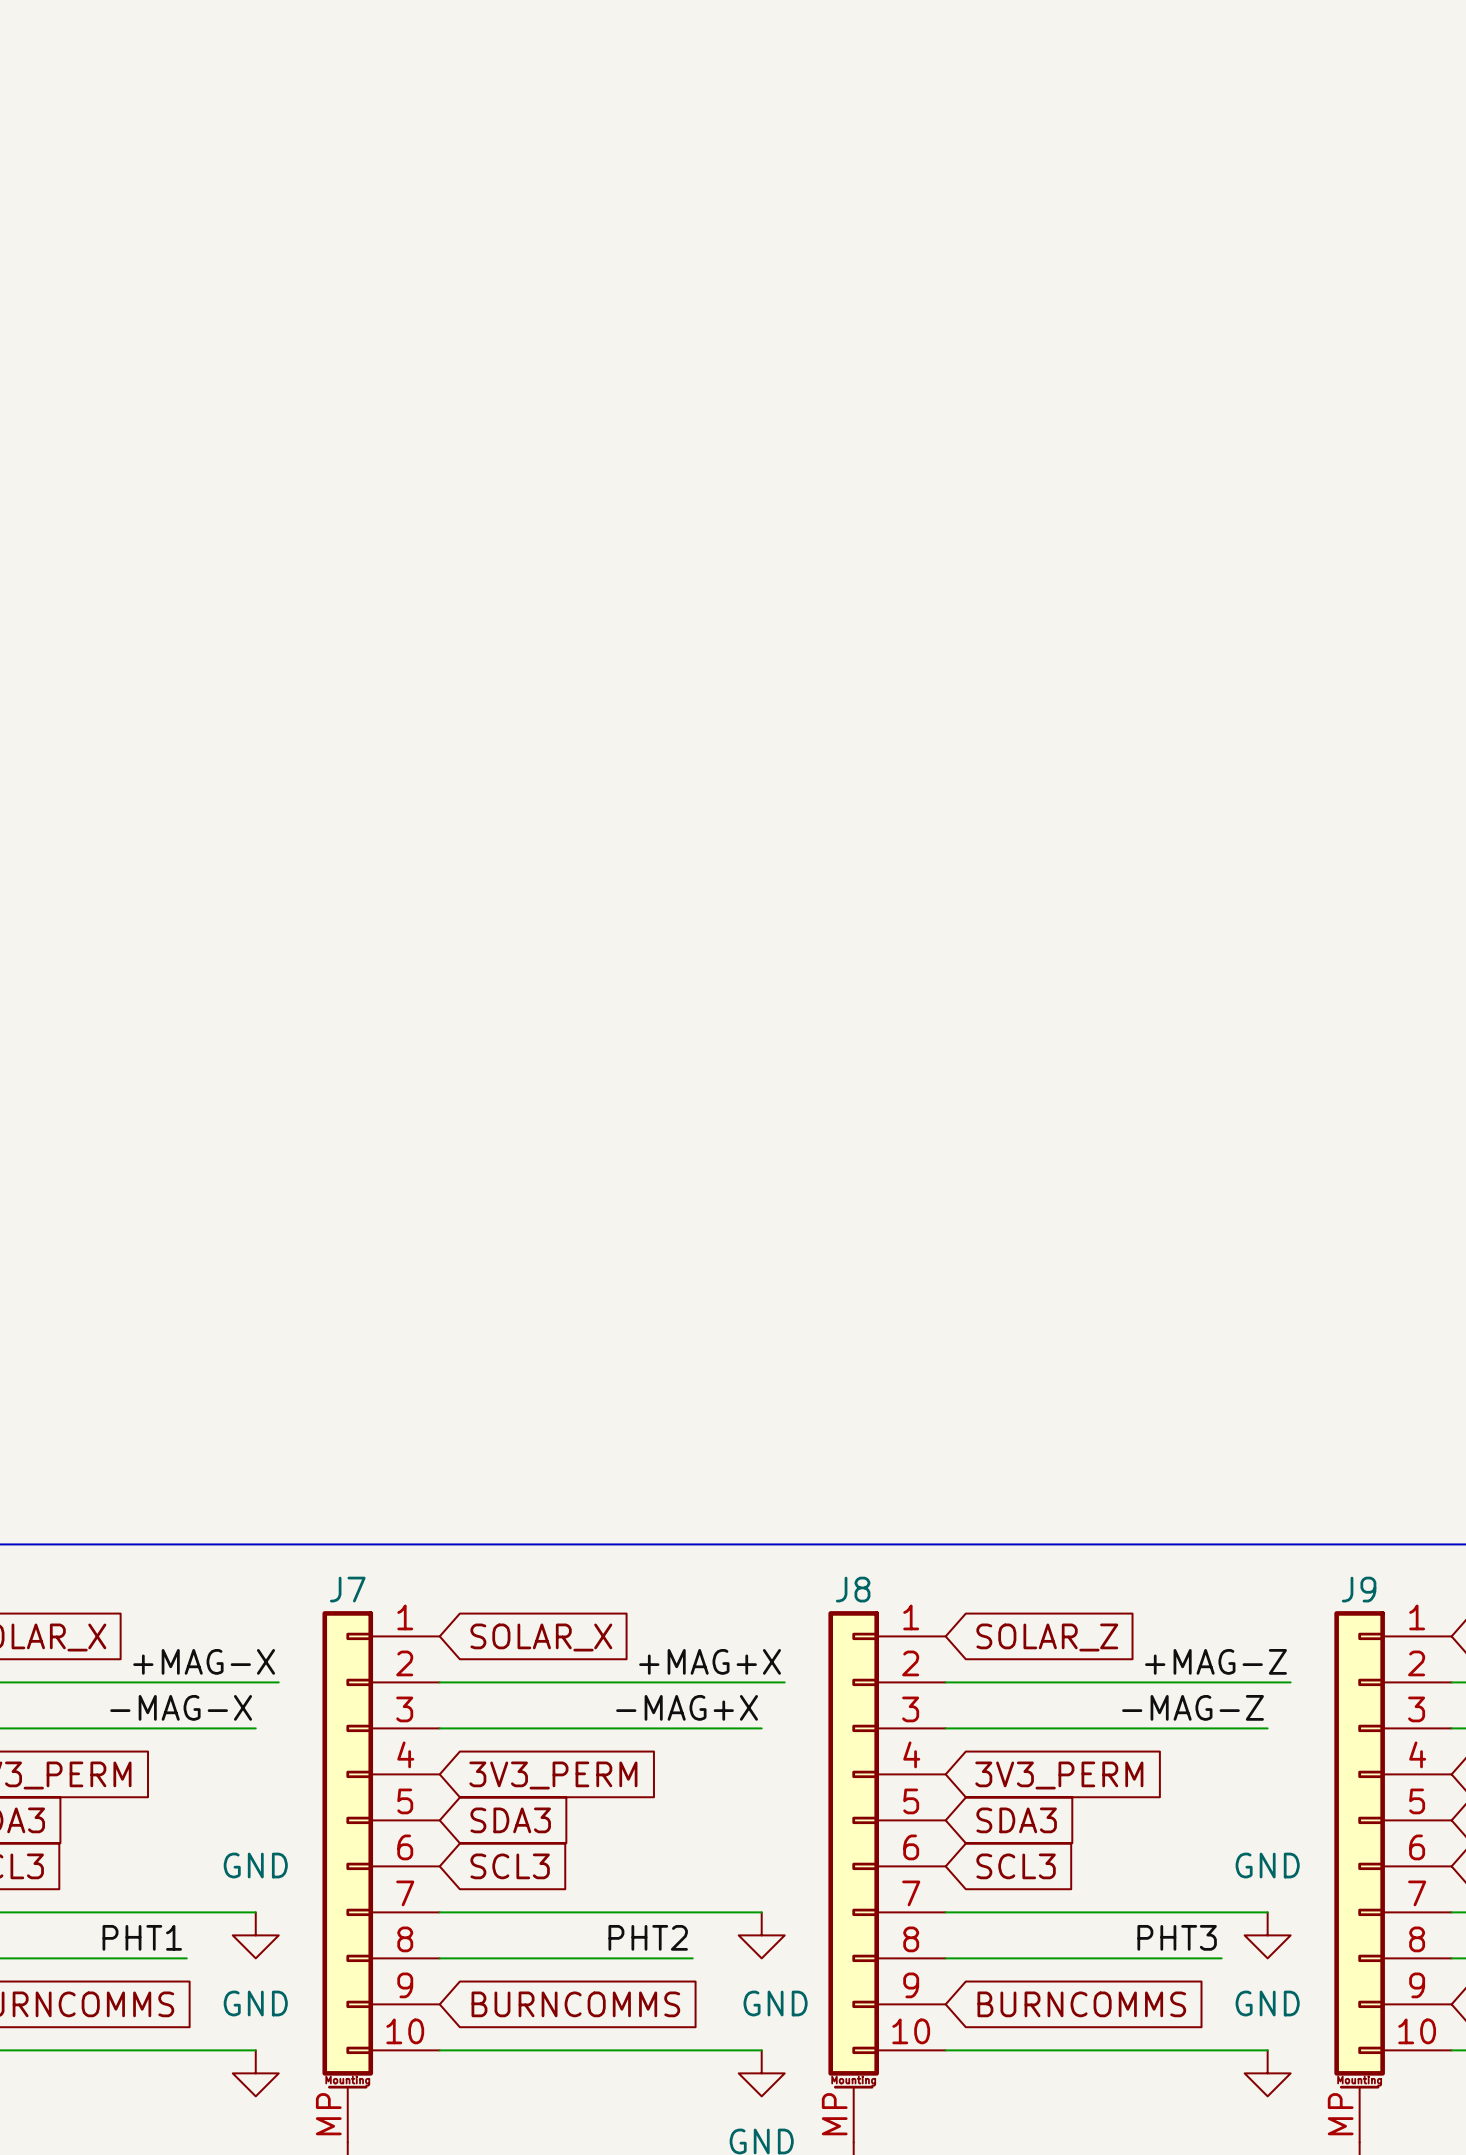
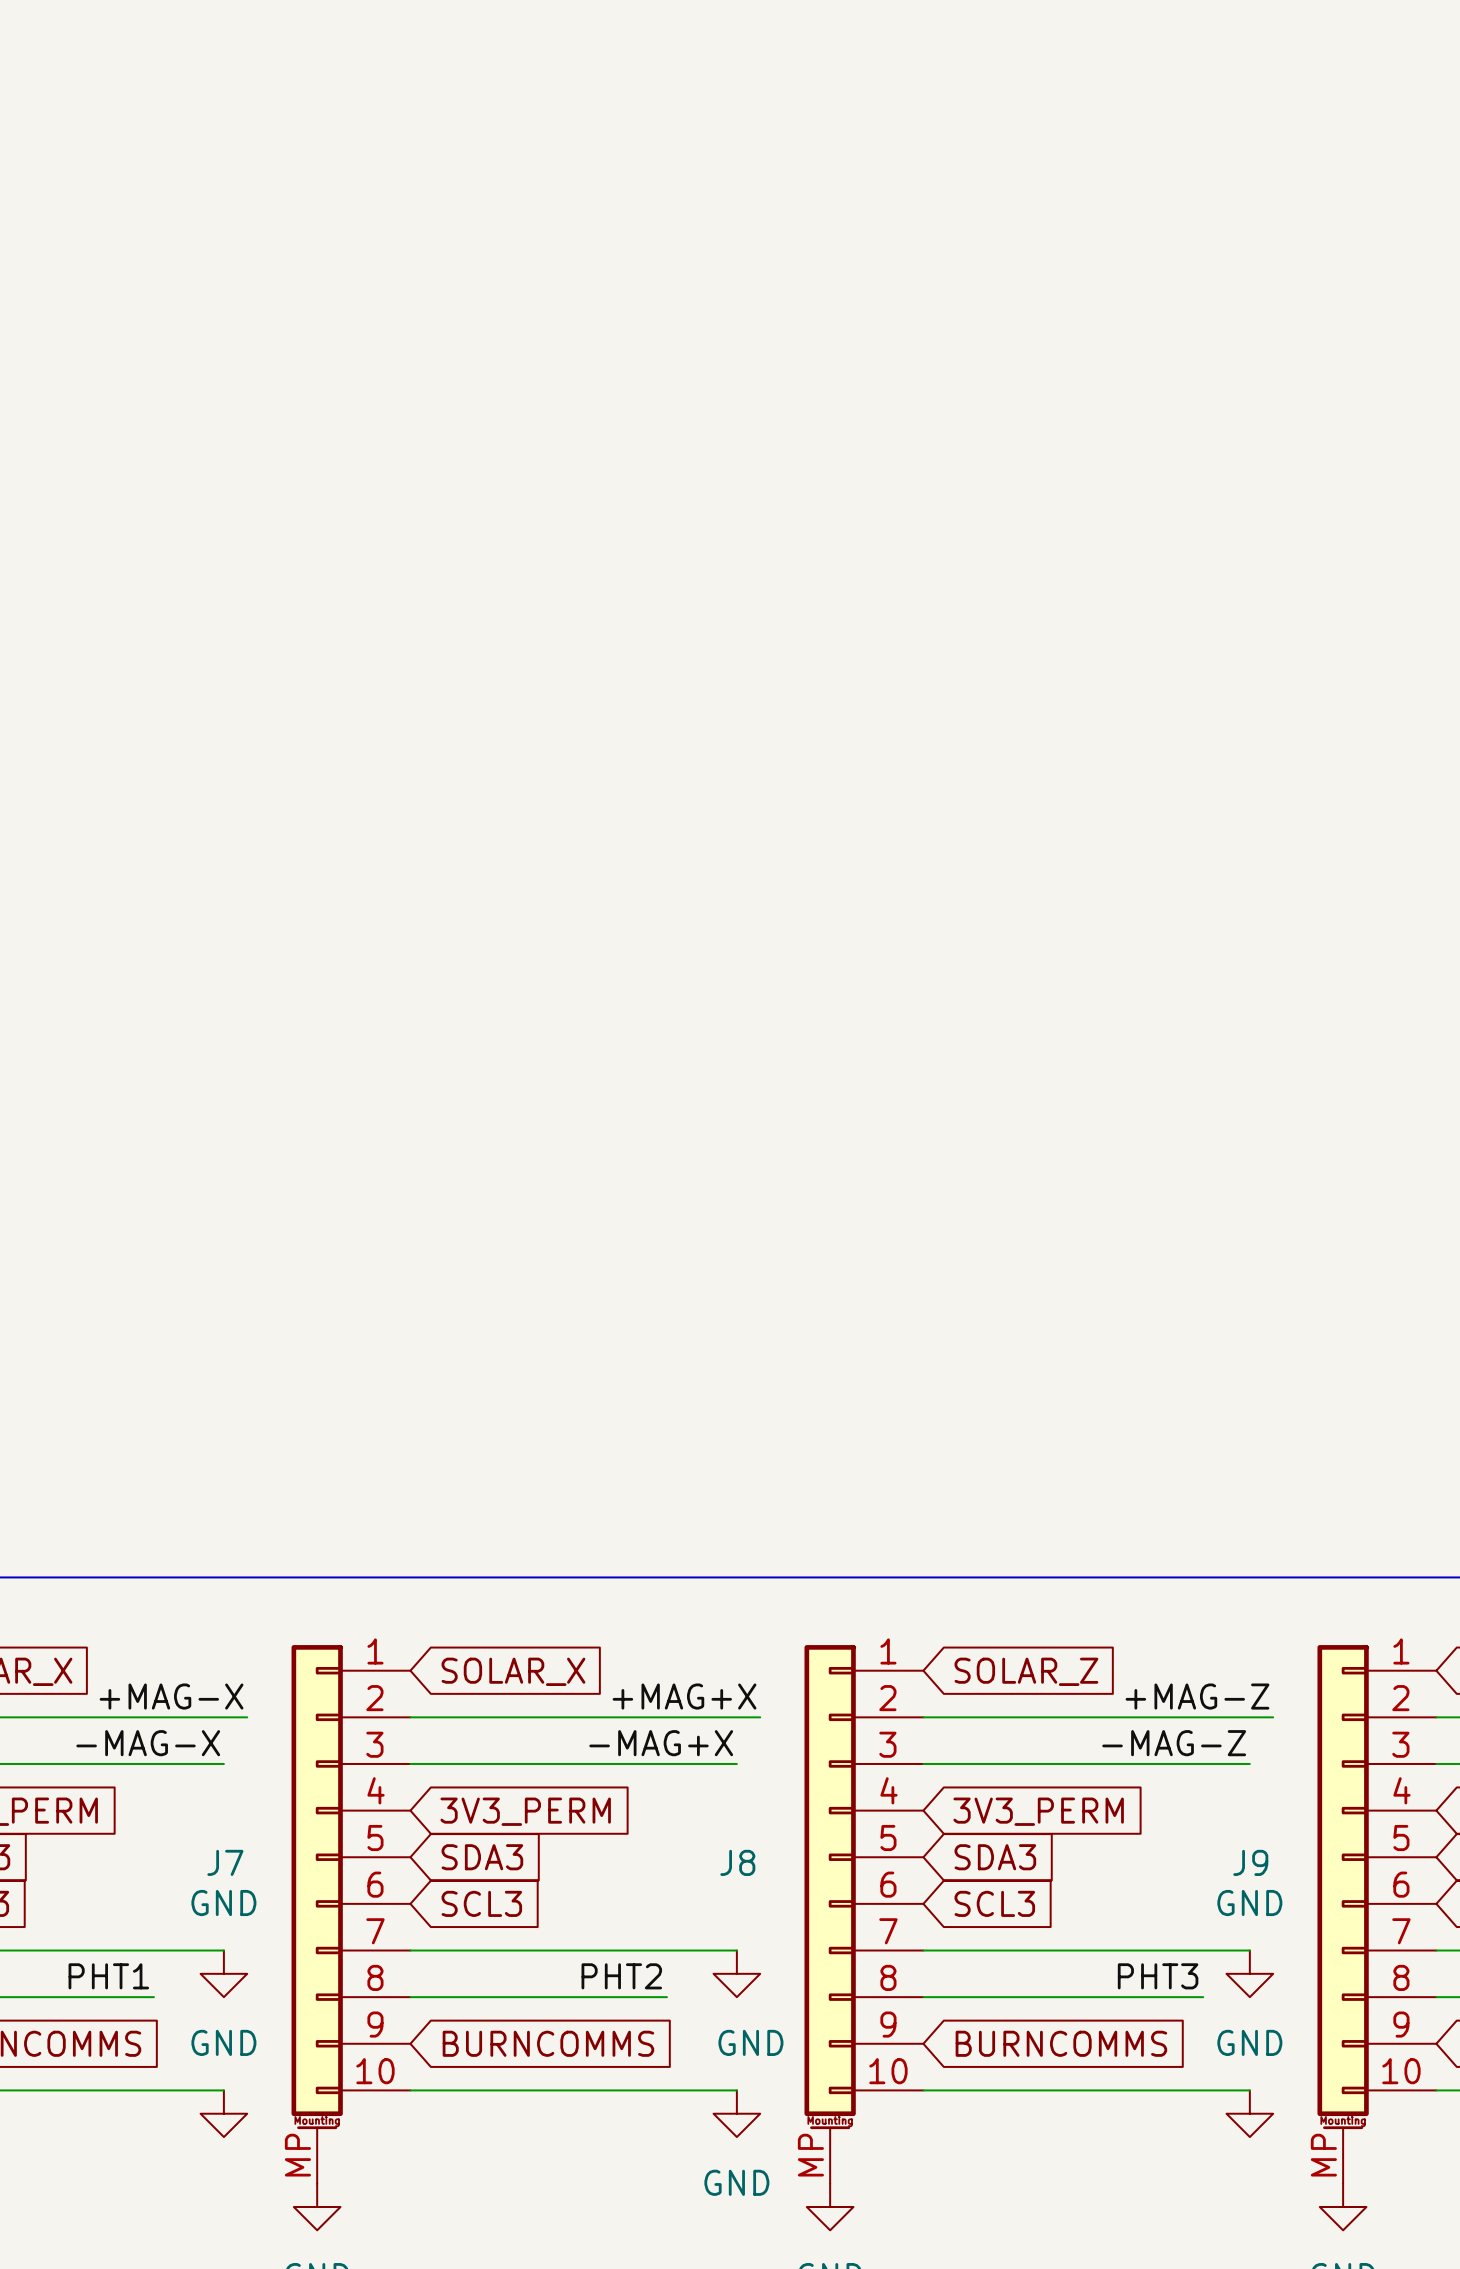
J7 name position: J7 (347, 1589) -> J7 (225, 1862)
J8 name position: J8 (853, 1589) -> J8 (737, 1862)
J9 name position: J9 (1359, 1589) -> J9 (1250, 1862)

